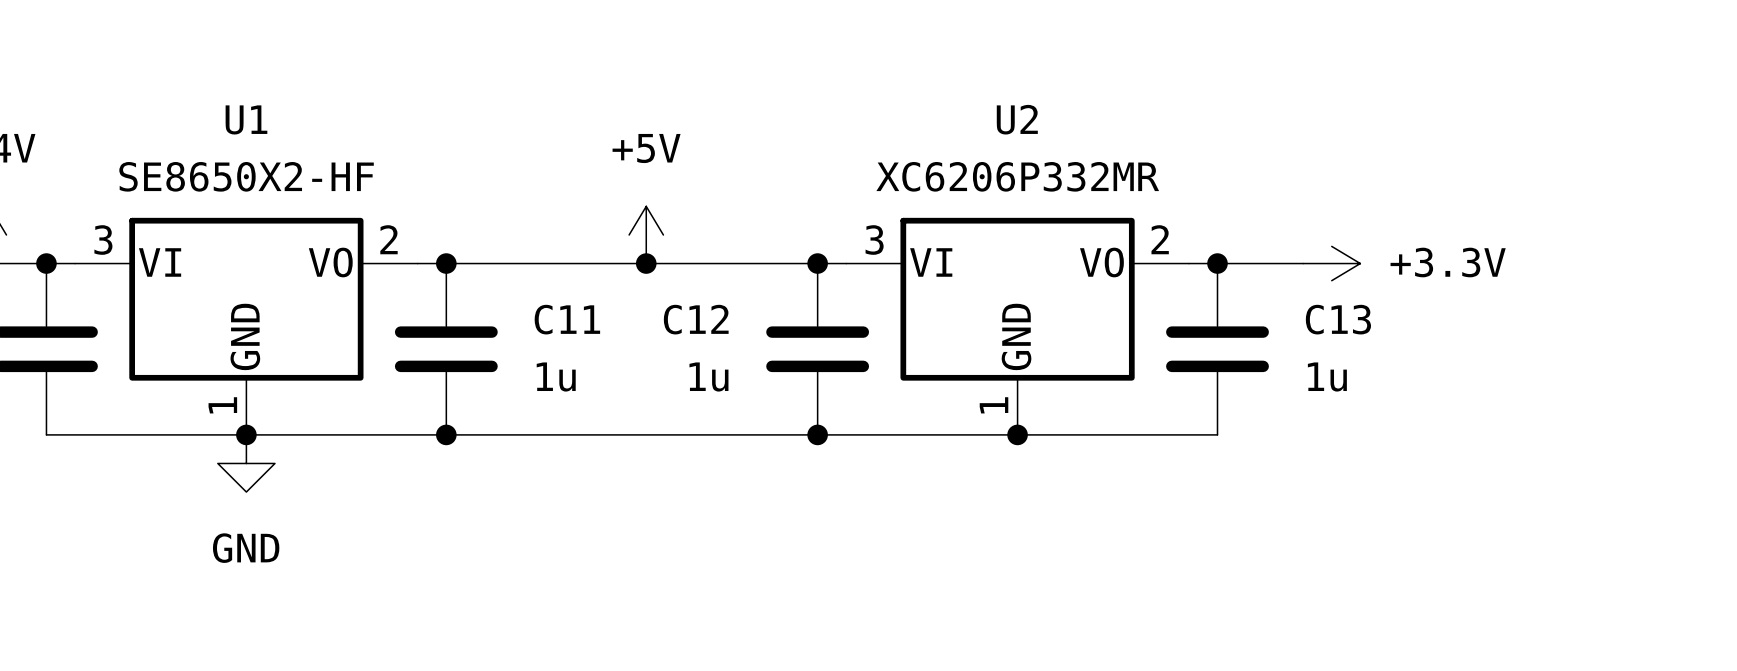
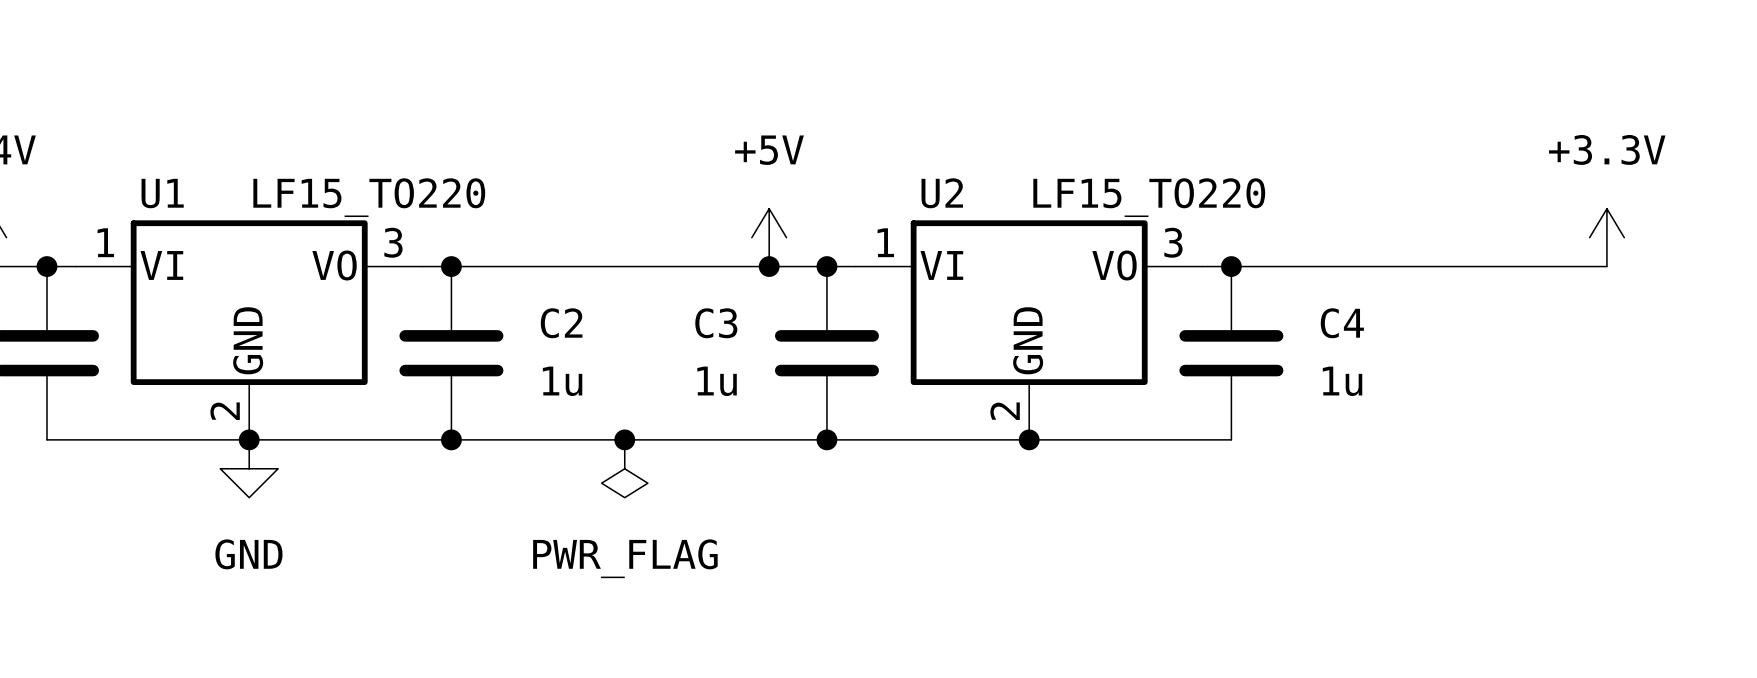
U1 name position: U1 (246, 119) -> U1 (162, 193)
U2 name position: U2 (1017, 119) -> U2 (942, 193)
U1 value: SE8650X2-HF (246, 176) -> LF15_TO220 (369, 197)
U2 value: XC6206P332MR (1017, 176) -> LF15_TO220 (1149, 197)
power symbol position: +5V (646, 234) -> +5V (769, 237)
U1 pin number: 2 (388, 239) -> 3 (393, 242)
U2 pin number: 2 (1160, 239) -> 3 (1173, 242)
U1 pin number: 3 (103, 240) -> 1 (105, 242)
U2 pin number: 3 (874, 240) -> 1 (885, 242)
power symbol text position: +3.3V (1448, 262) -> +3.3V (1607, 149)
junction: (646, 263) -> none
junction: none -> (769, 266)
wire: none -> (1318, 266) (1606, 266)
power symbol rotation: 0° (1331, 263) -> 90° counterclockwise (1606, 237)
power symbol position: +3.3V (1331, 263) -> +3.3V (1606, 237)
C11 name: C11 (567, 319) -> C2 (561, 323)
C12 name: C12 (696, 319) -> C3 (716, 323)
C13 name: C13 (1338, 319) -> C4 (1342, 323)
U1 pin number: 1 (222, 405) -> 2 (225, 411)
U2 pin number: 1 (994, 405) -> 2 (1005, 411)
junction: none -> (624, 439)
power symbol: none -> PWR_FLAG (624, 468)

